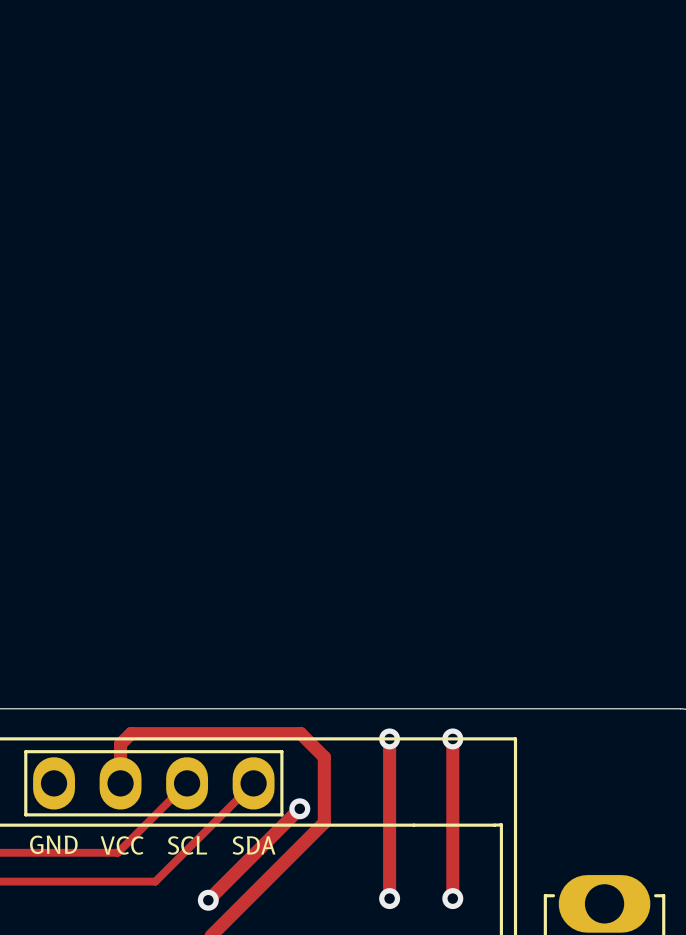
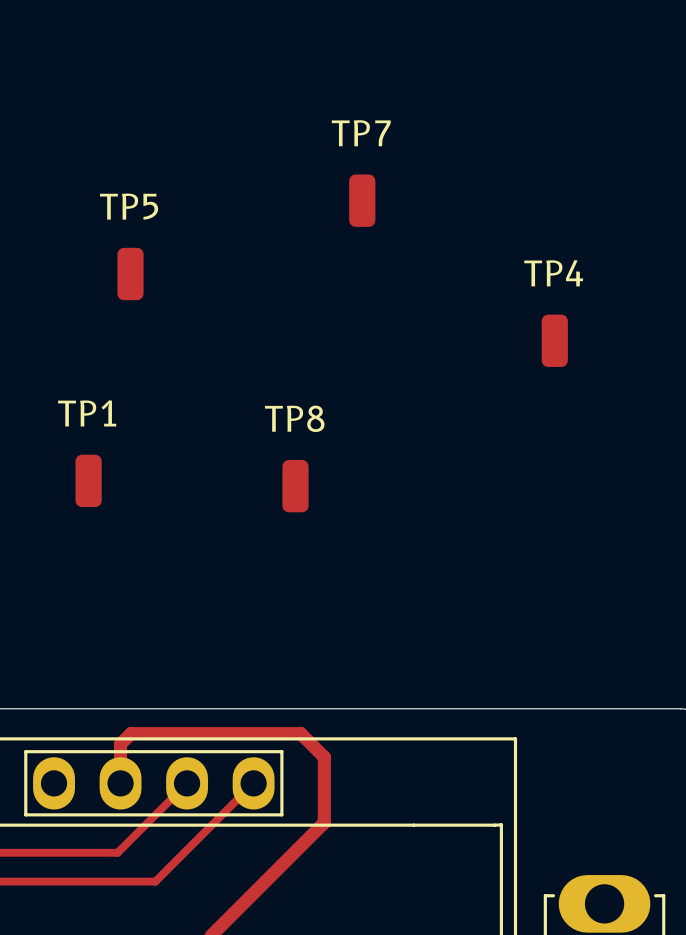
TP7: none -> (362, 200)
TP5: none -> (130, 274)
TP4: none -> (554, 340)
TP1: none -> (88, 480)
TP8: none -> (295, 486)
track: (389, 738) (389, 898) -> none
via: (389, 738) -> none
track: (452, 738) (452, 898) -> none
via: (452, 738) -> none
track: (299, 808) (208, 900) -> none
via: (299, 808) -> none
text: GND (53, 844) -> none
text: VCC (122, 845) -> none
text: SCL (187, 845) -> none
text: SDA (254, 845) -> none
via: (389, 898) -> none
via: (452, 898) -> none
via: (208, 900) -> none

